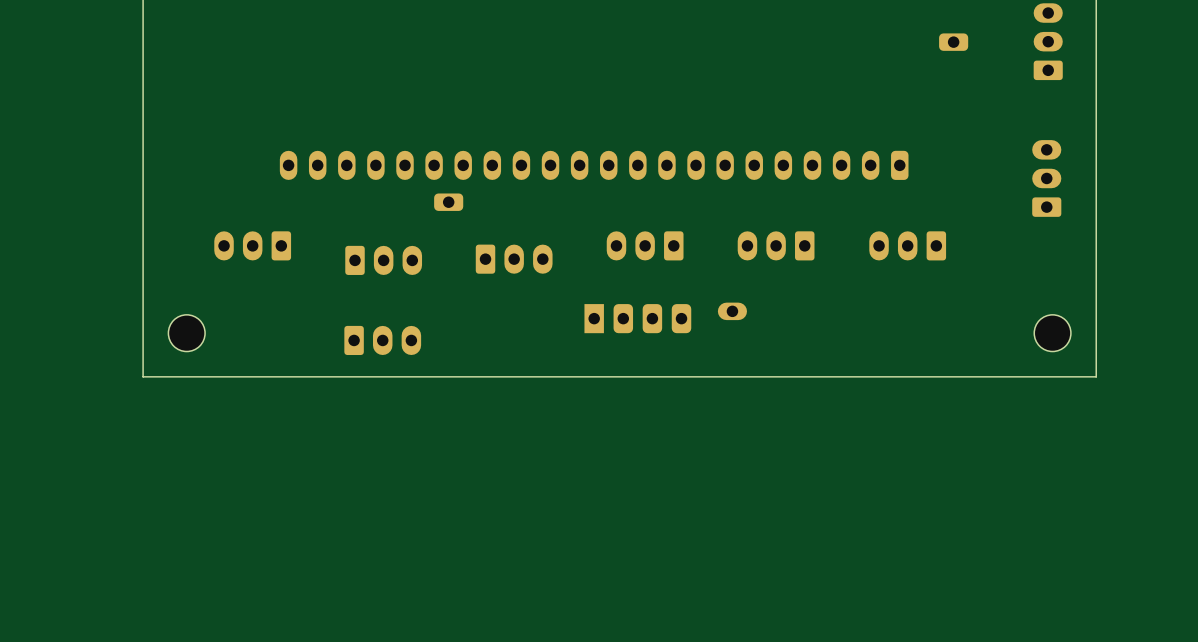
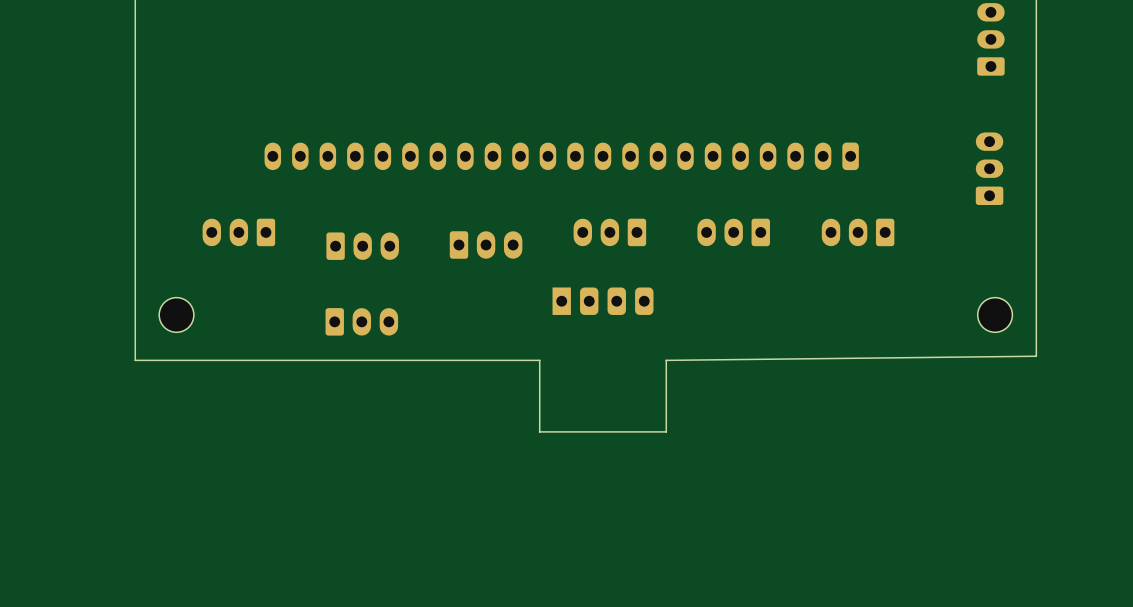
part: (953, 42) -> none
part: (448, 202) -> none
part: (732, 311) -> none
board edge: (1096, 376) (143, 376) -> (1036, 356) (666, 360) (666, 431) (539, 431) (539, 360) (135, 360) (135, 356)

